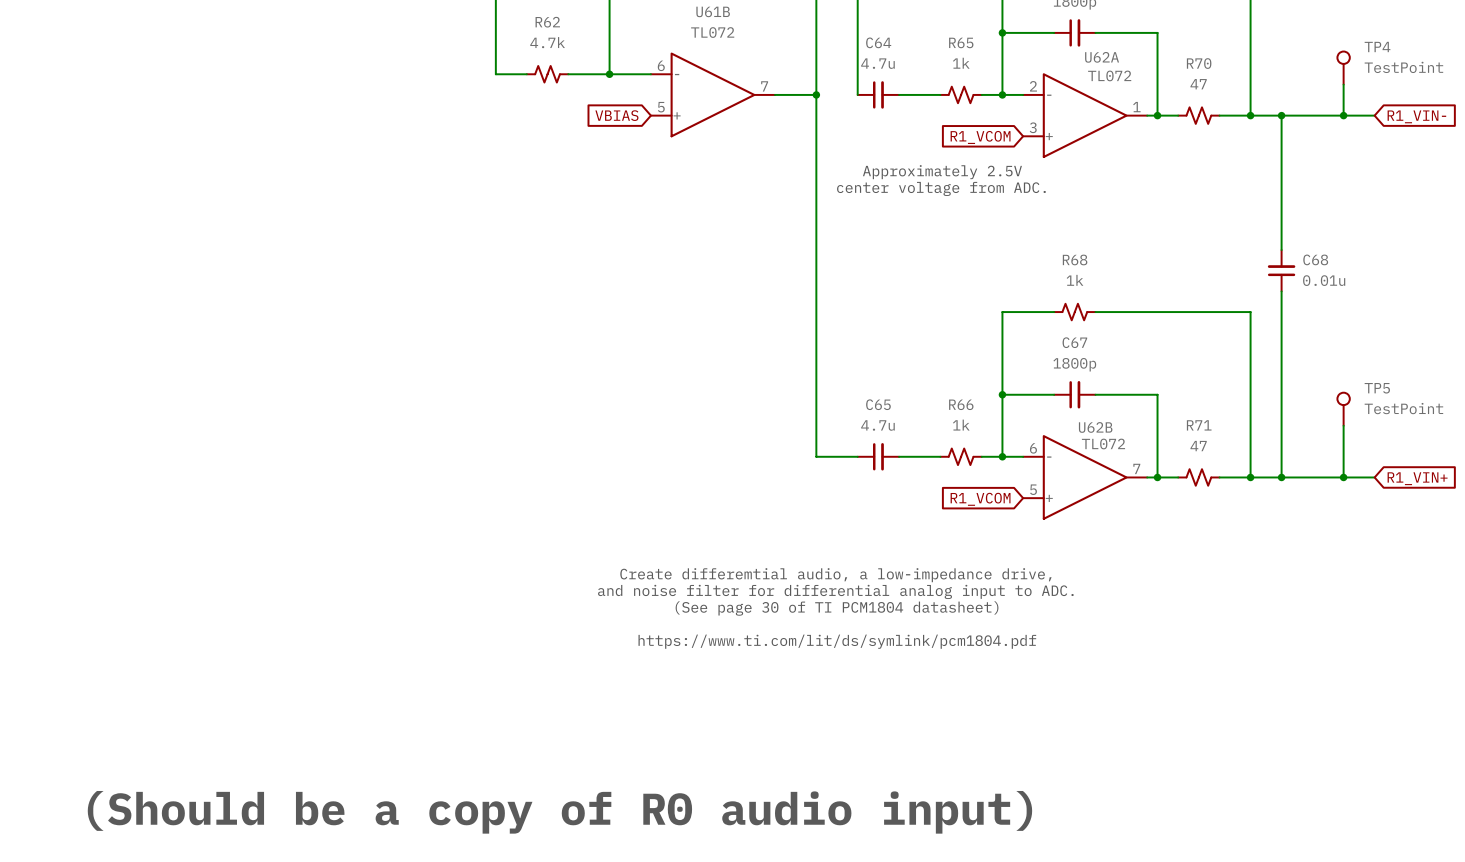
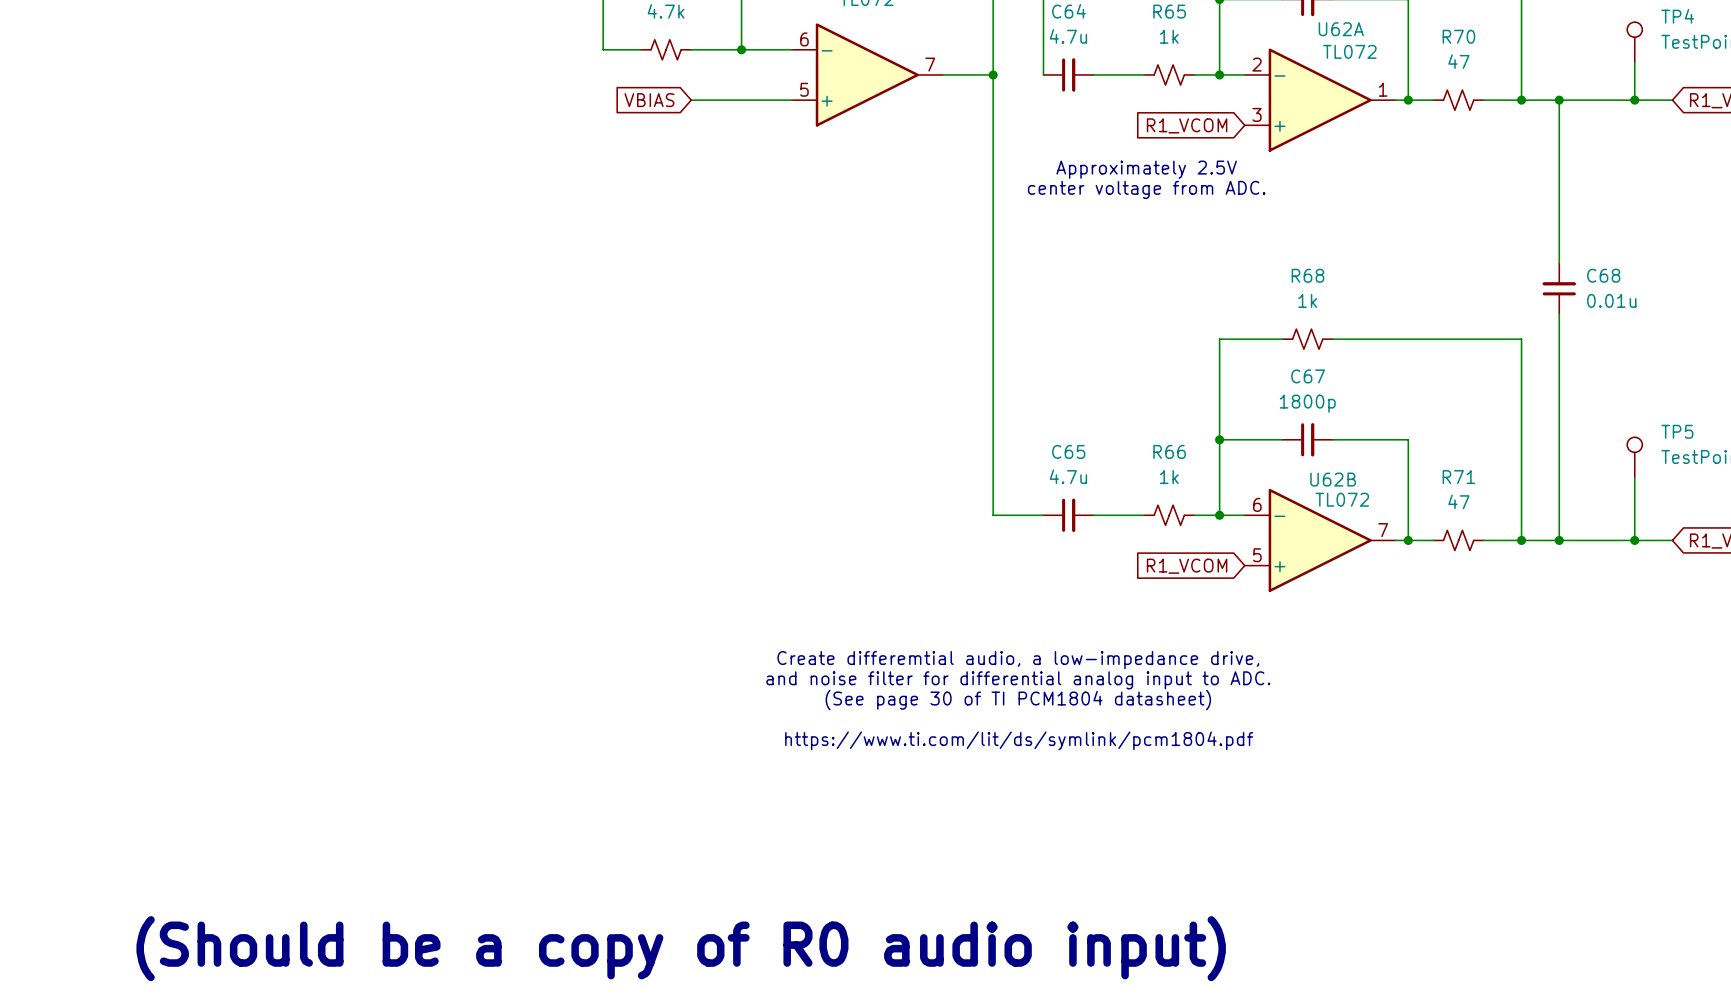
wire: none -> (691, 100) (791, 100)
global label position: VBIAS (616, 115) -> VBIAS (649, 100)

